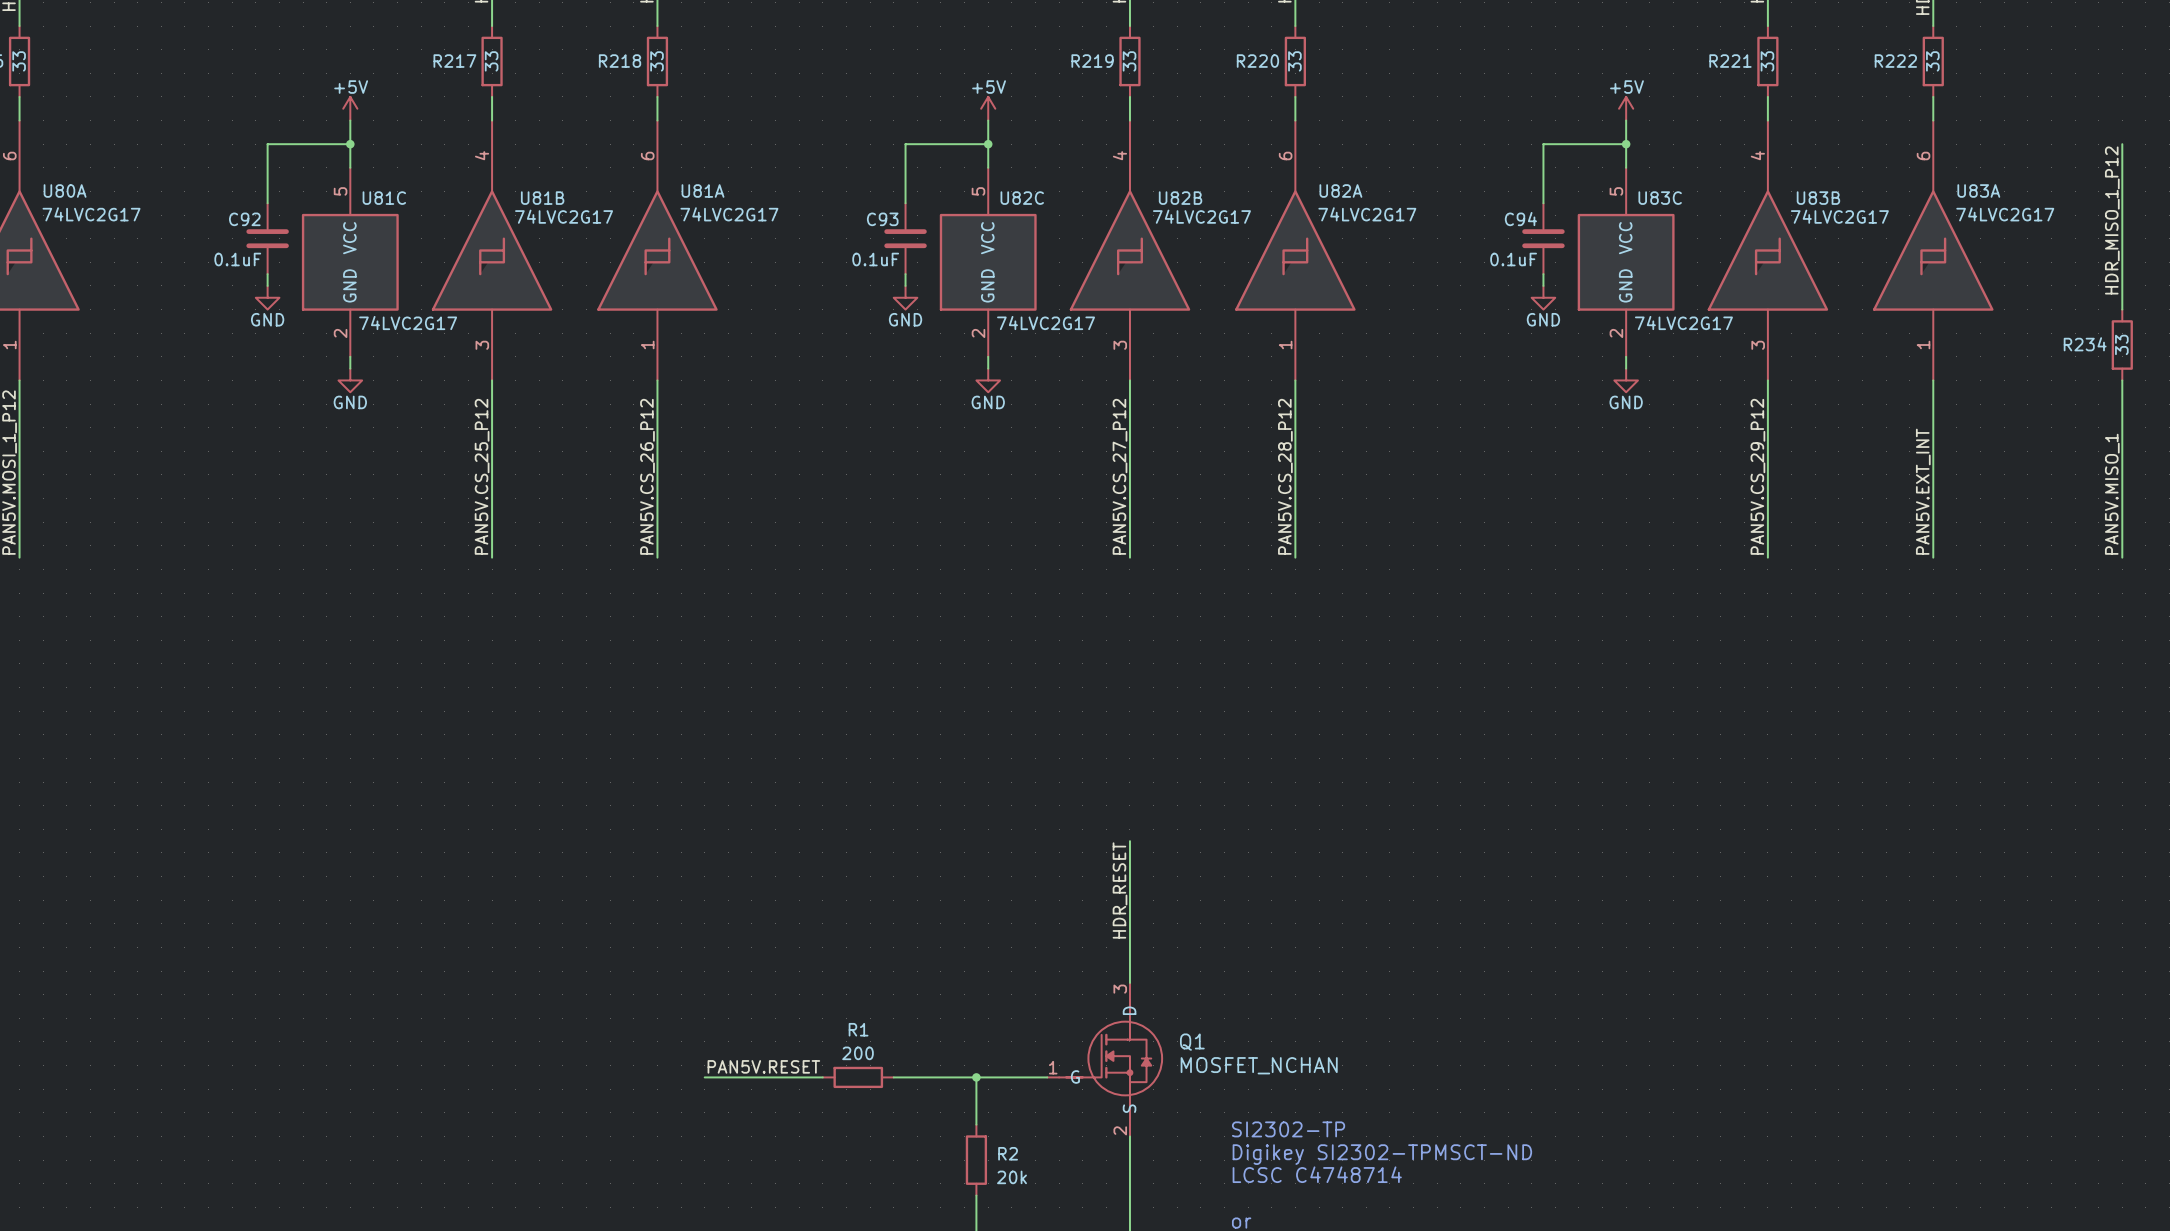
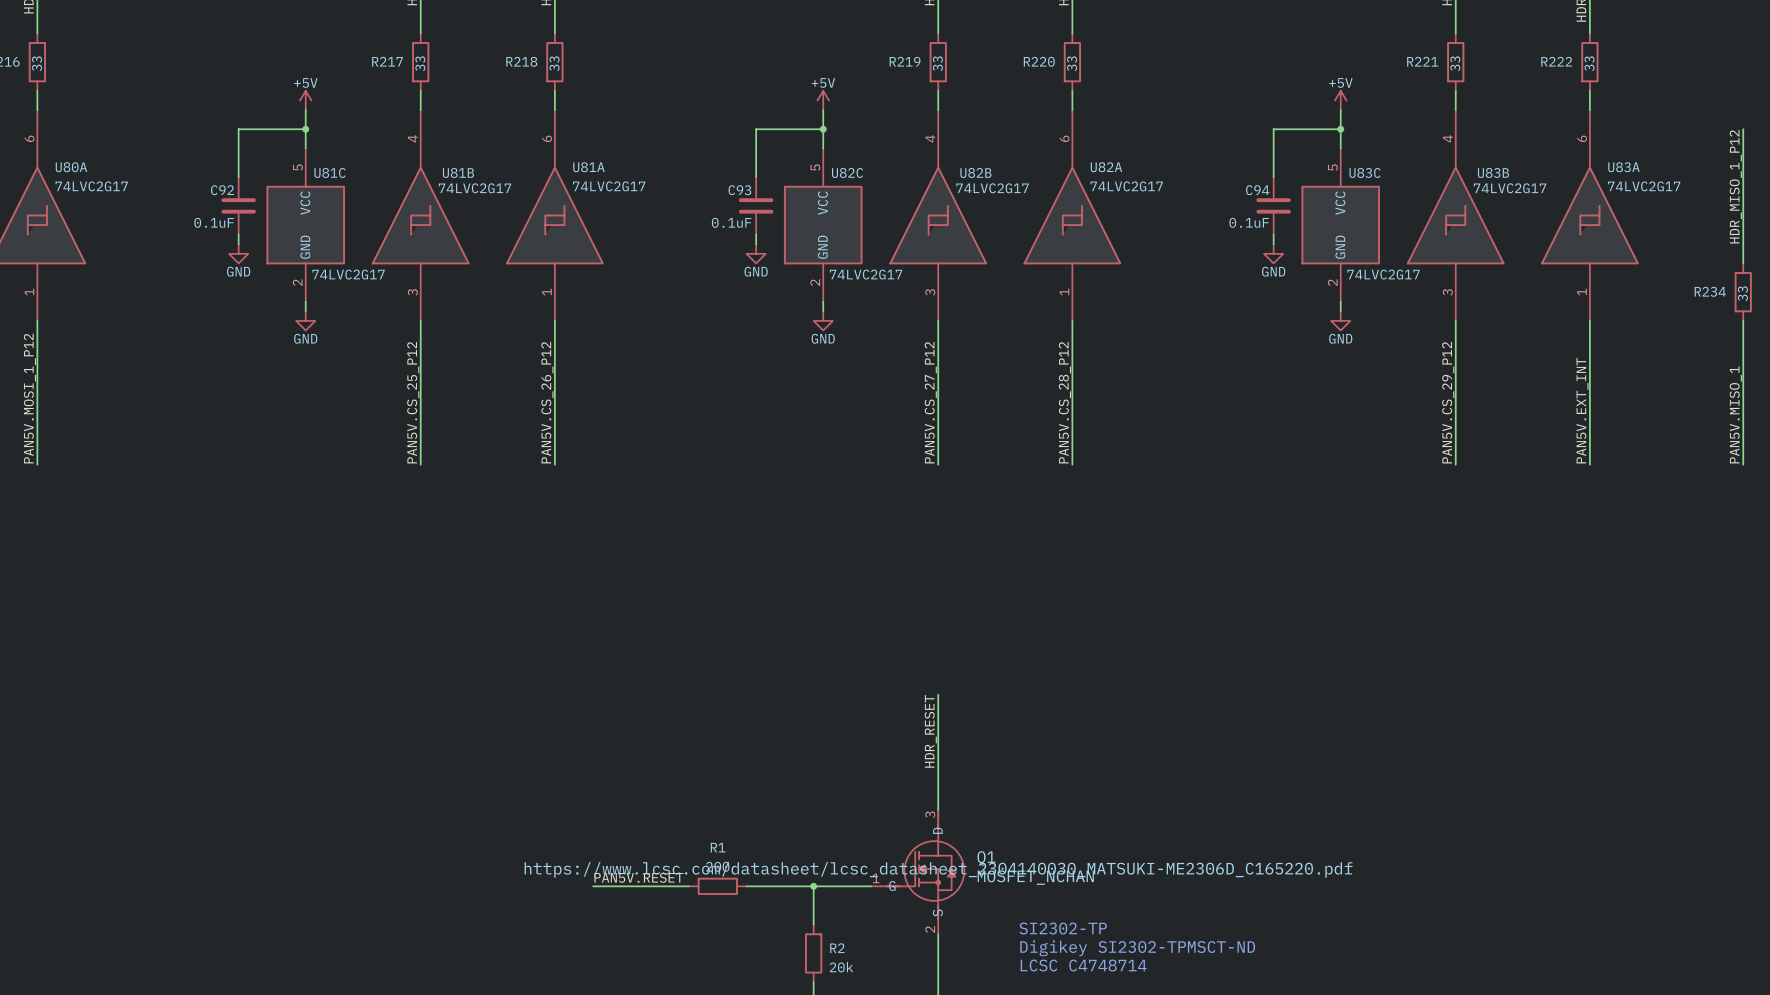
Q1 text: none -> https://www.lcsc.com/datasheet/lcsc_datasheet_2304140030_MATSUKI-ME2306D_C165220.pdf (938, 869)

